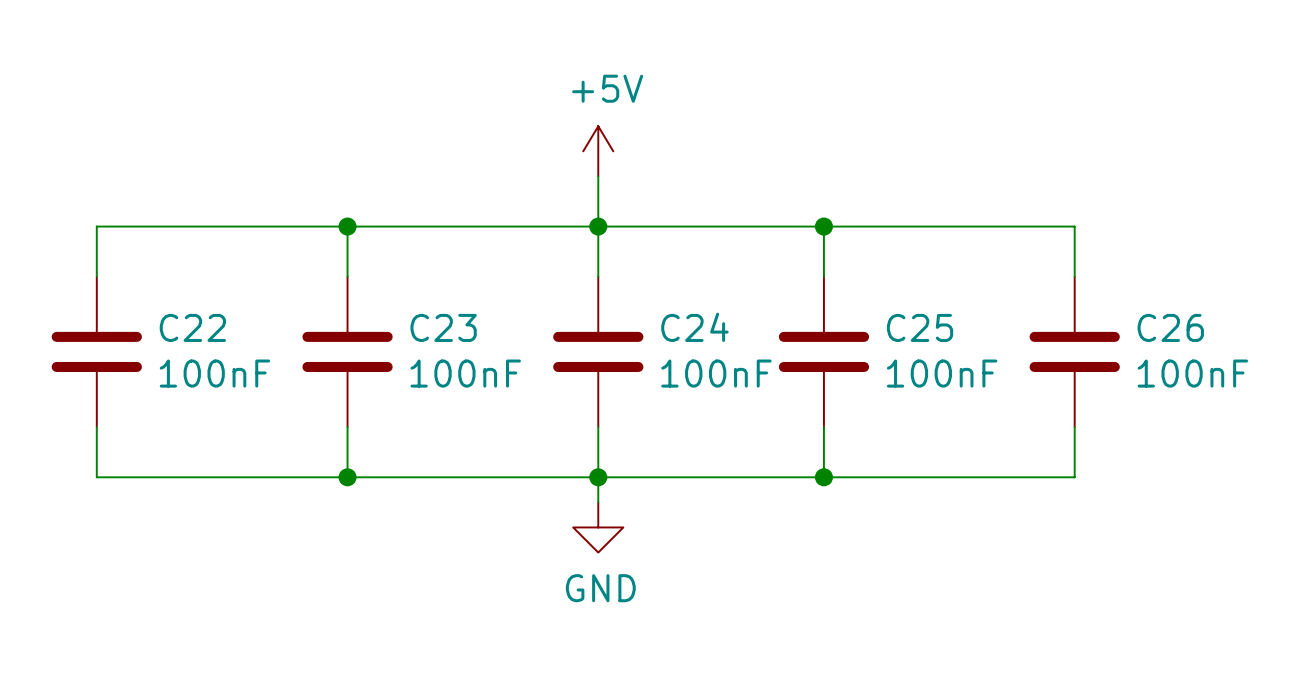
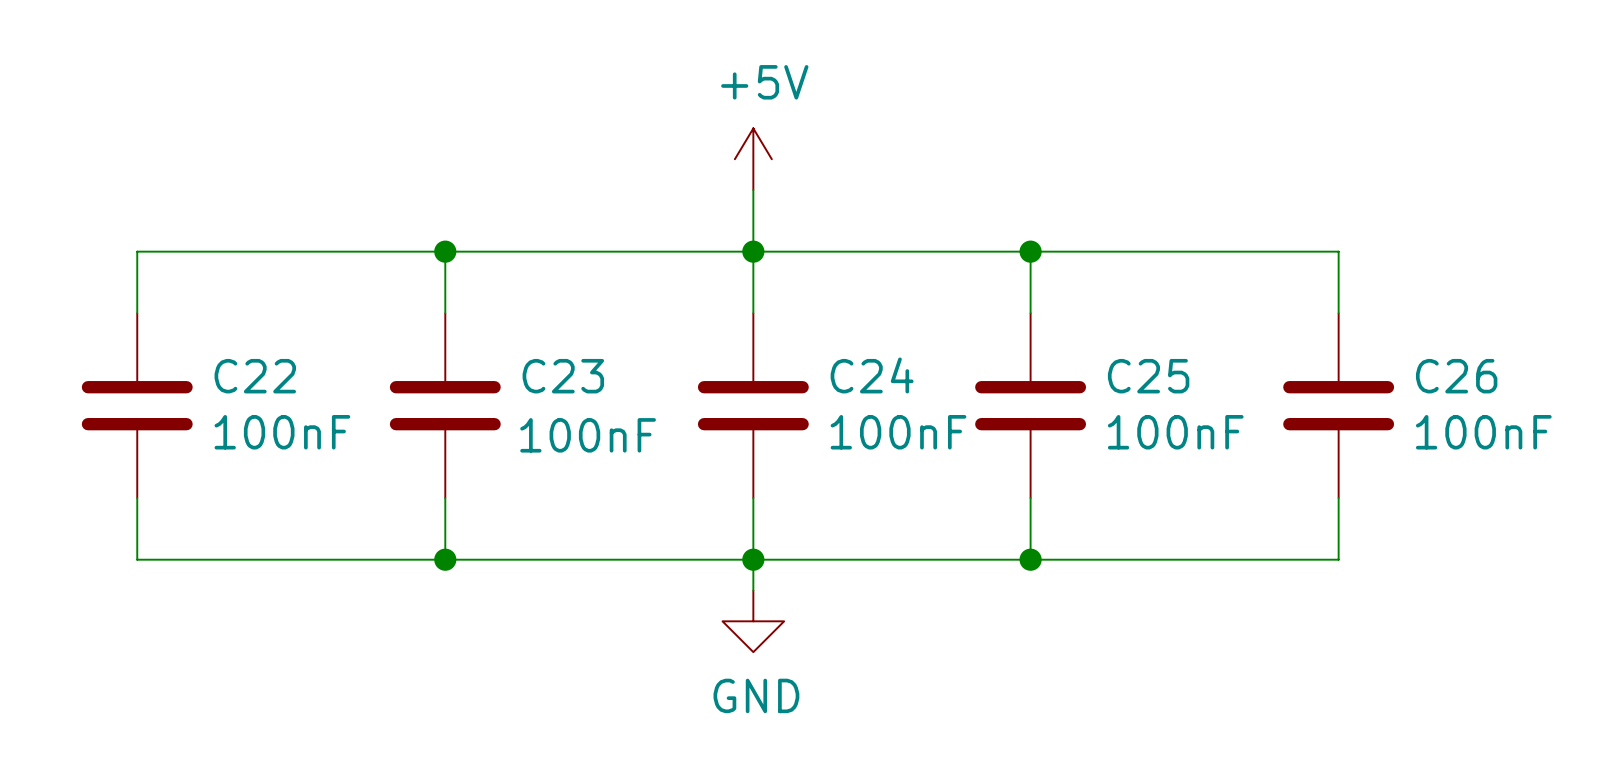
C23 value position: 100nF (465, 373) -> 100nF (588, 435)

